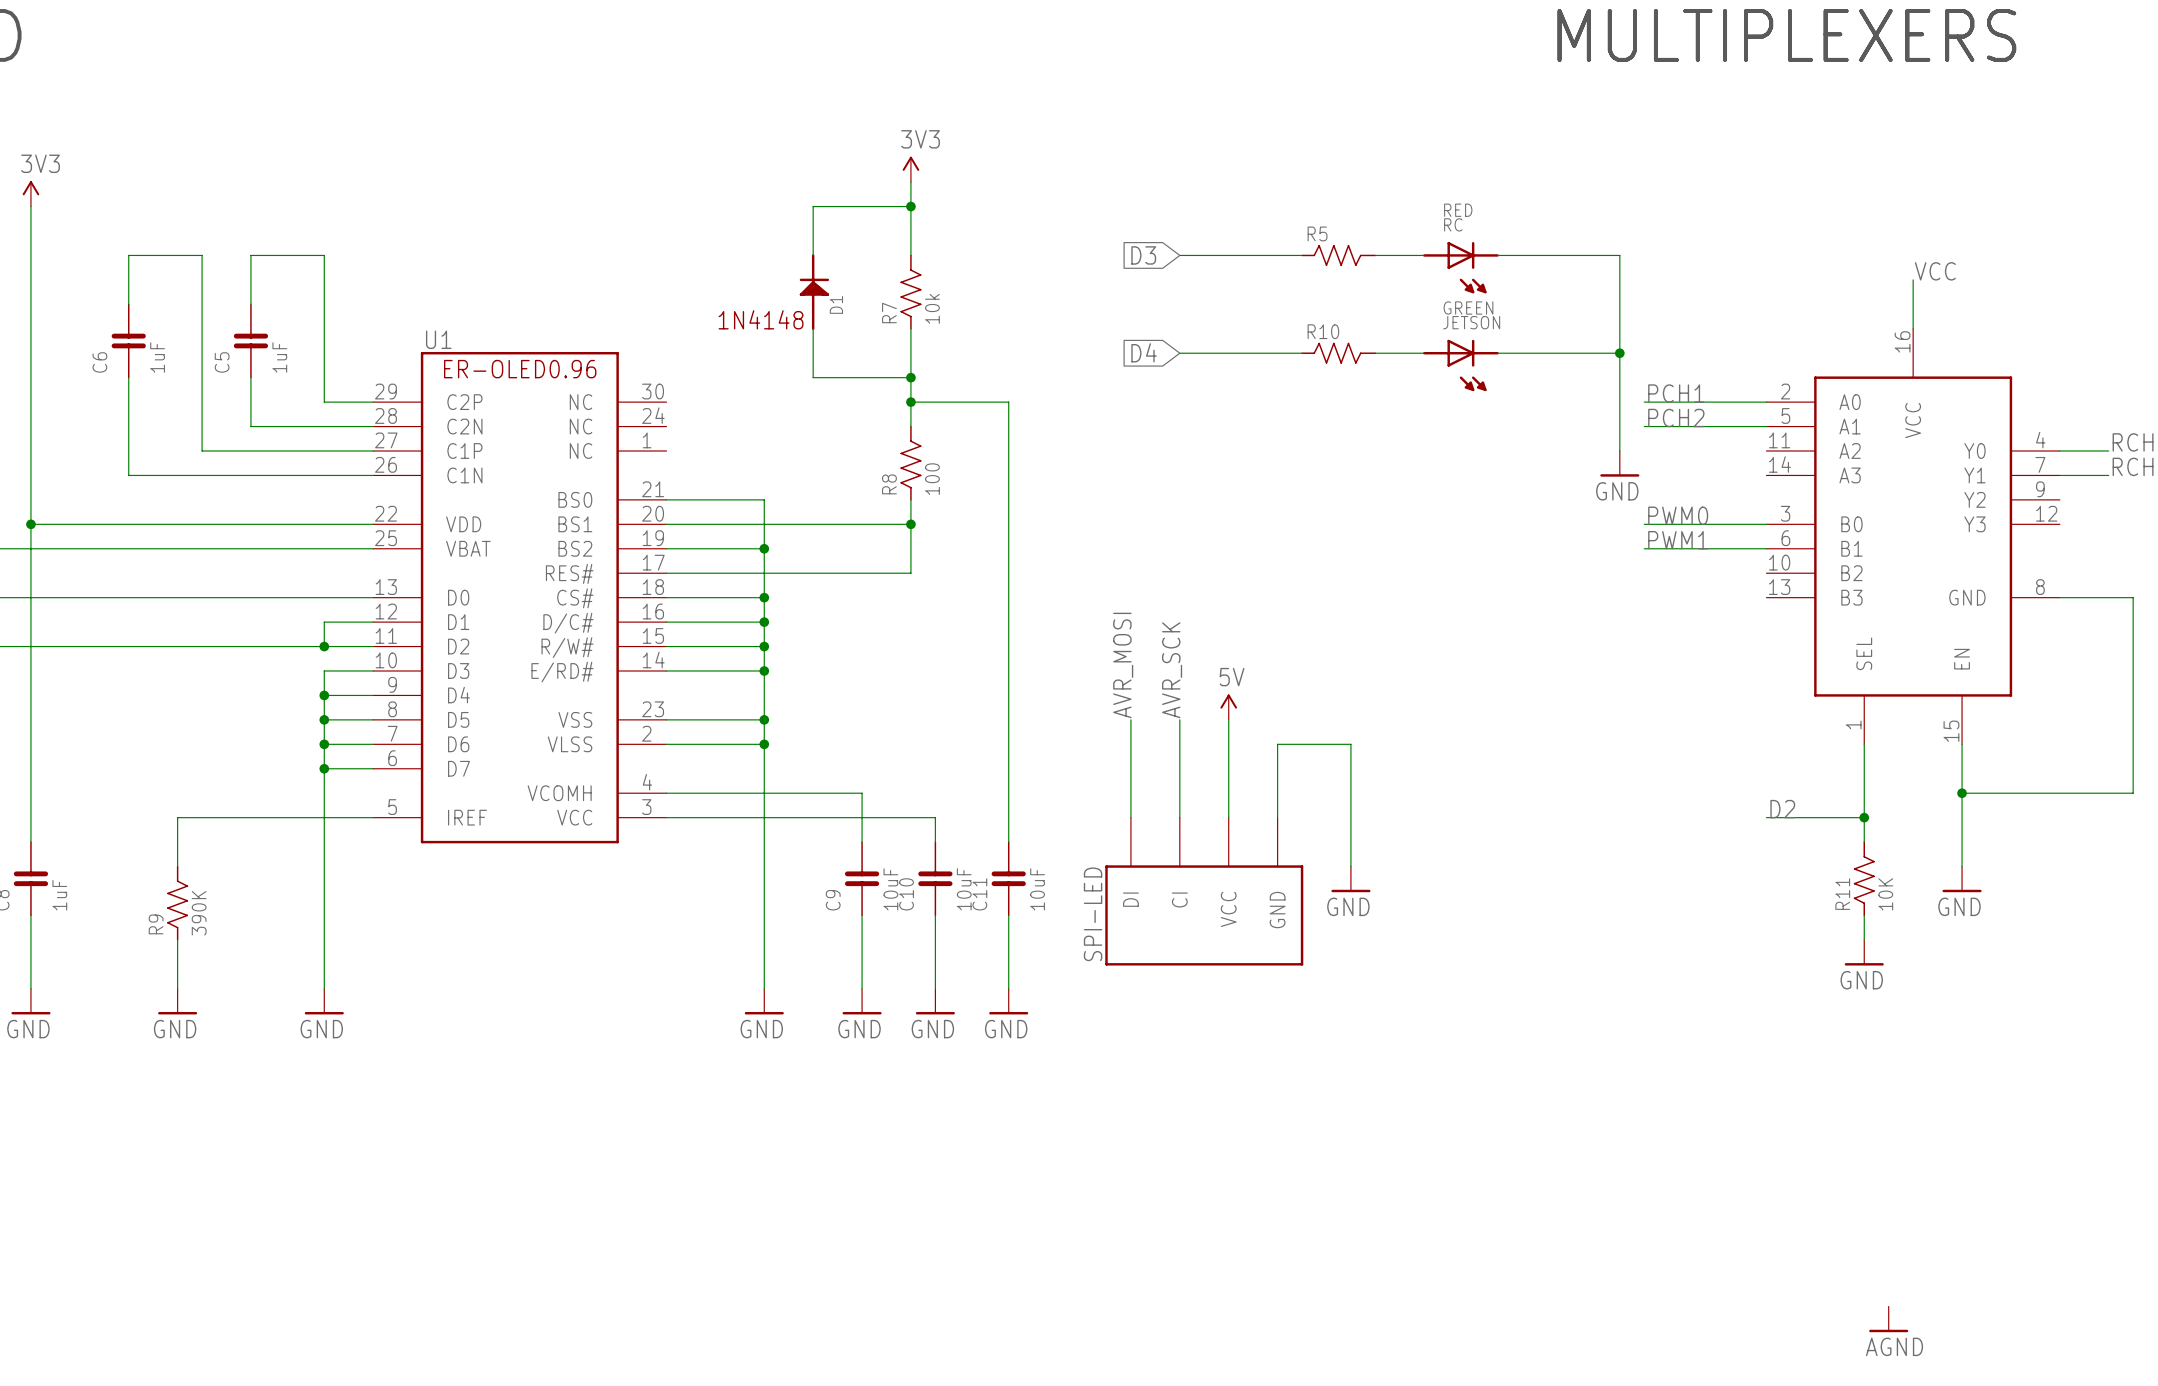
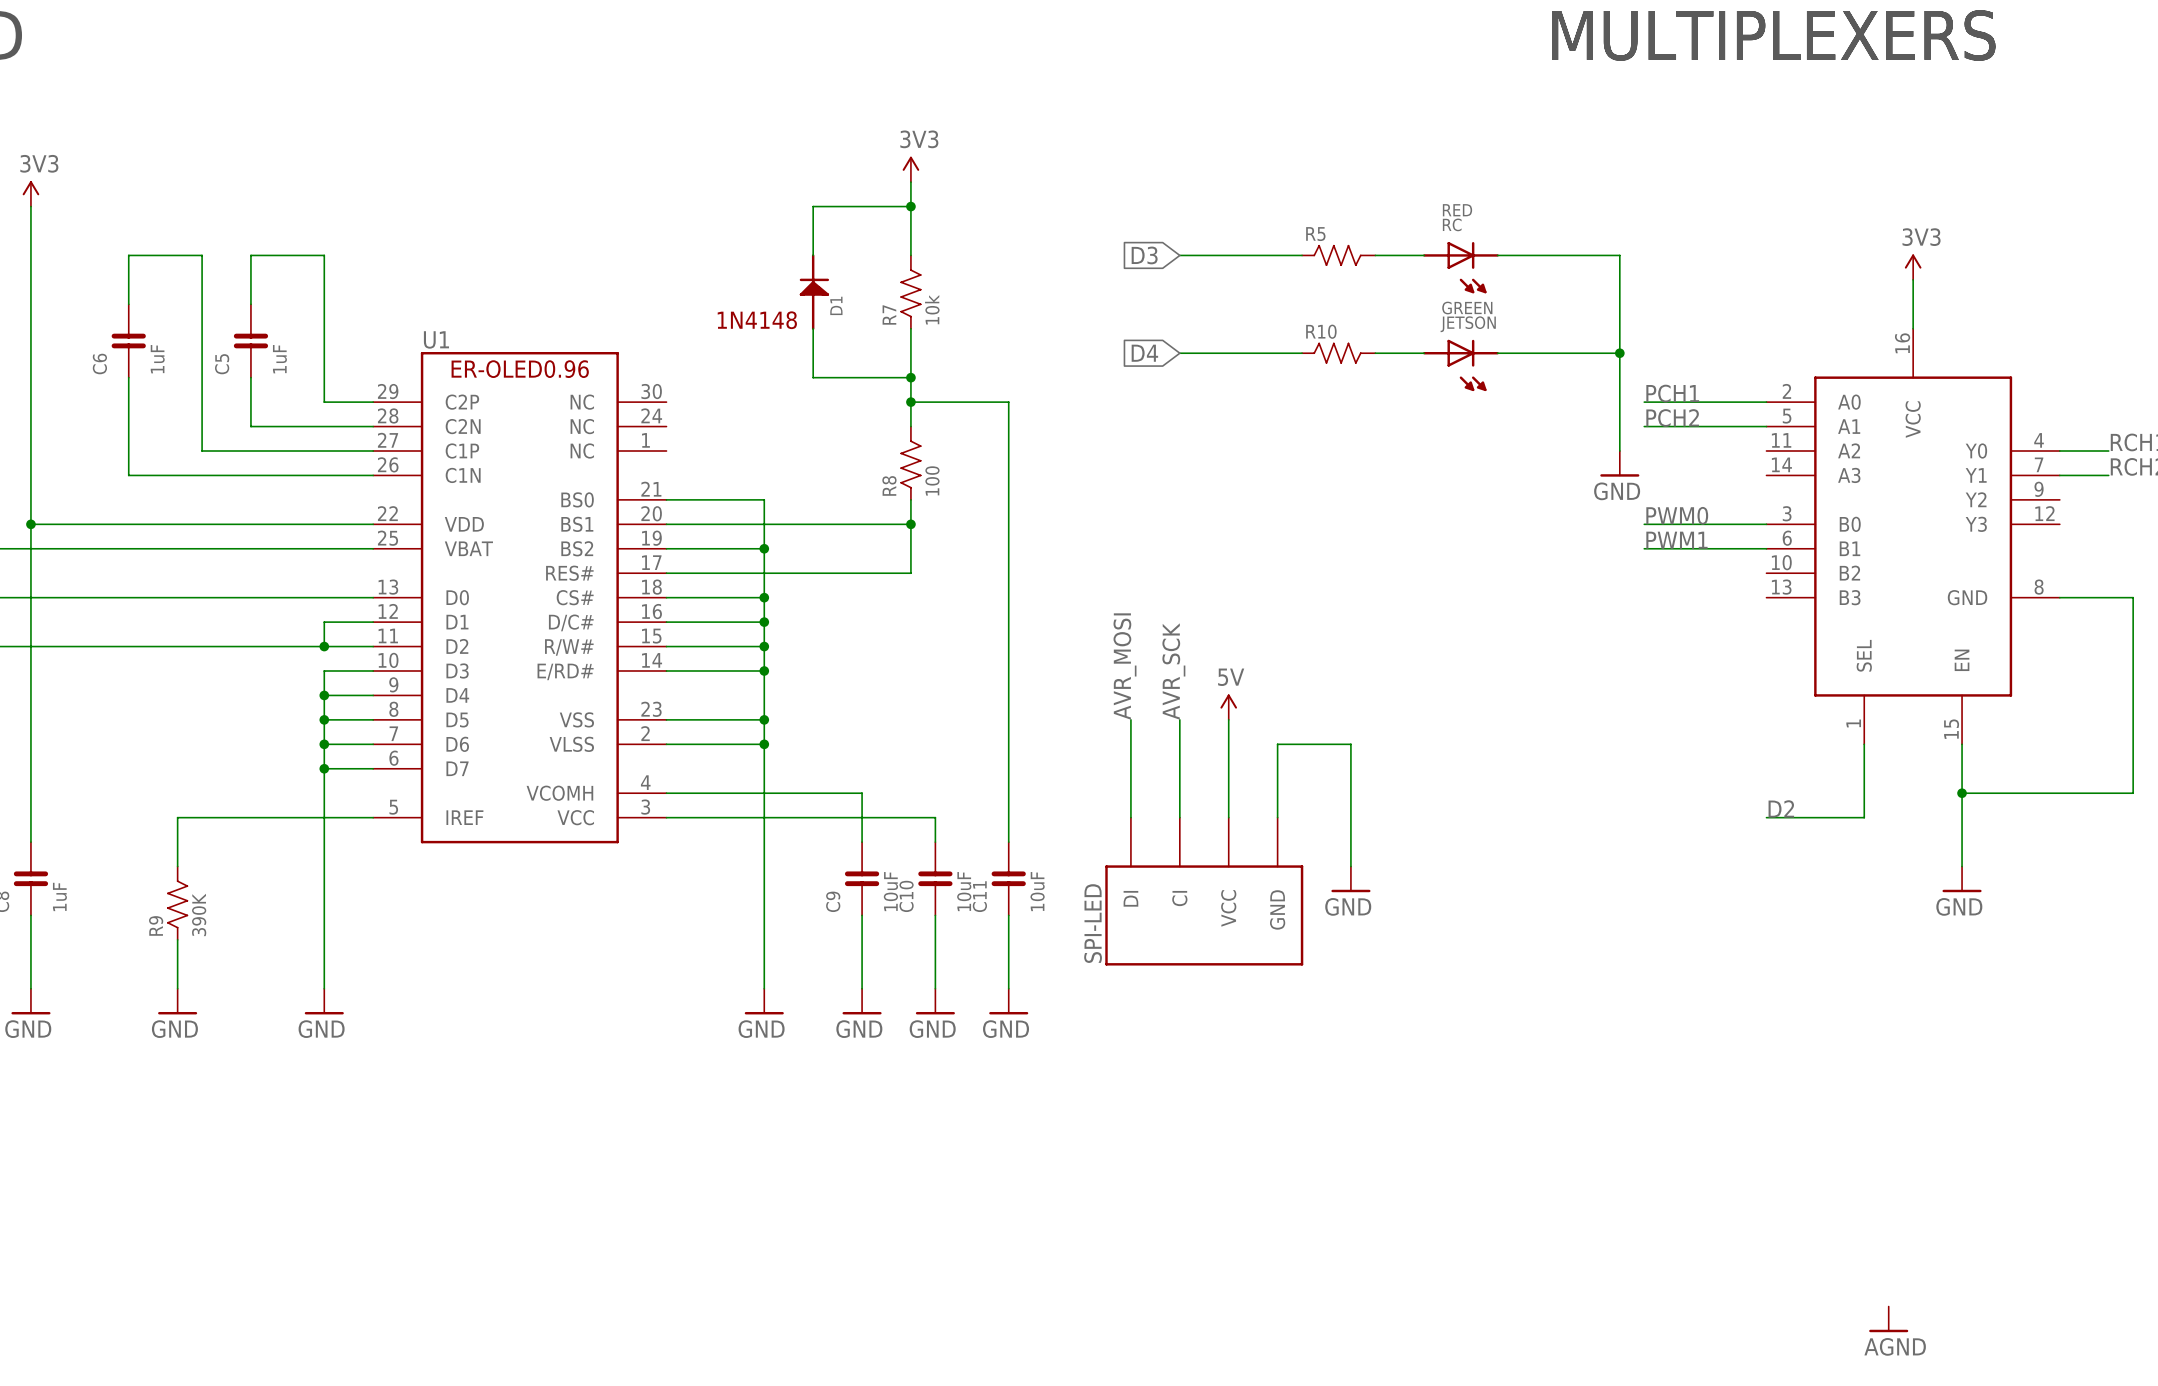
power symbol: none -> 3V3 (1913, 267)
label: VCC (1935, 271) -> none
wire: (1864, 817) (1864, 842) -> none
junction: (1864, 817) -> none
R11: 10K (1864, 878) -> none
wire: (1864, 915) (1864, 939) -> none
power symbol: GND (1864, 952) -> none

